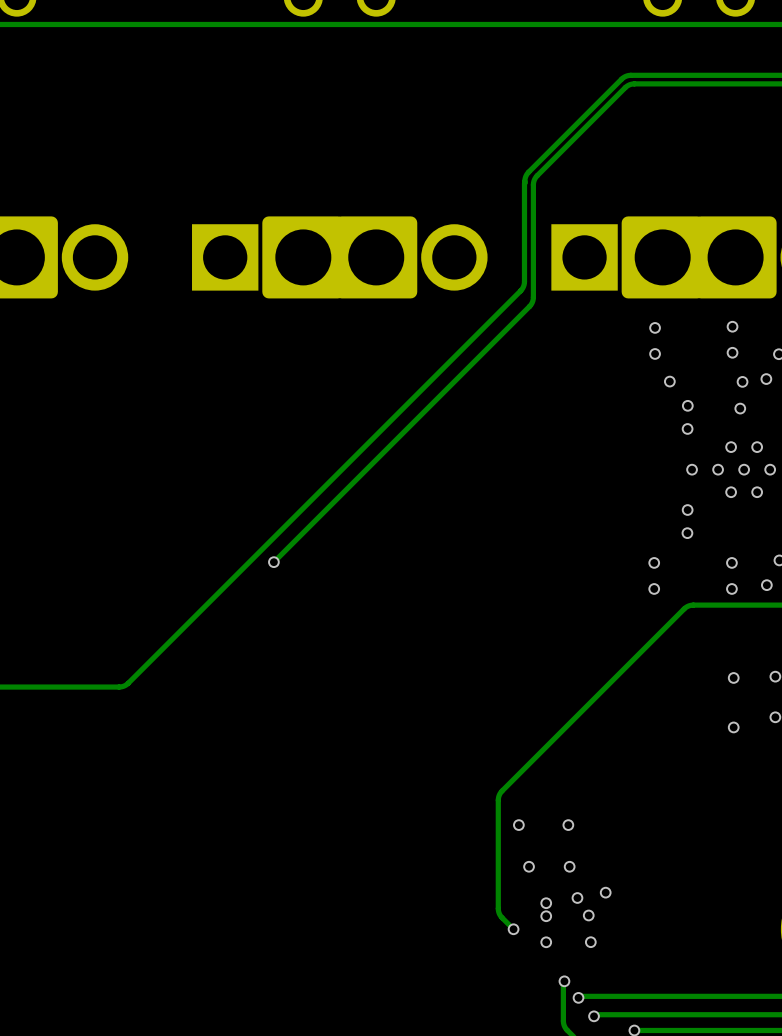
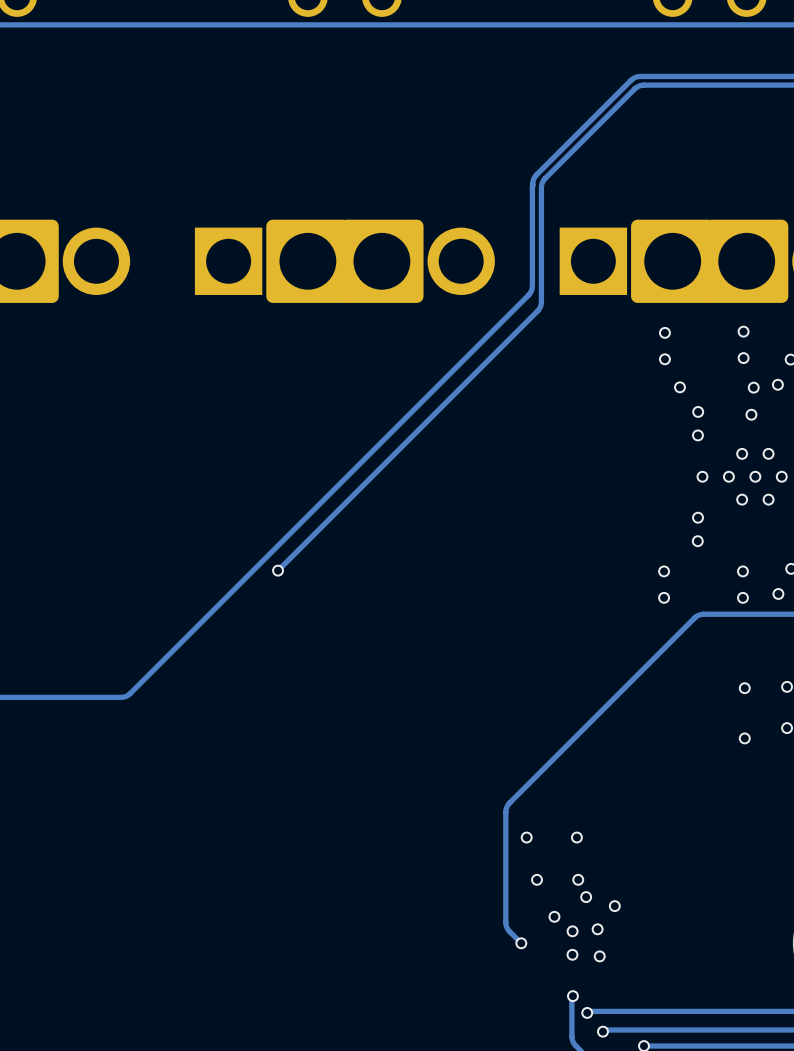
via: none -> (586, 897)
via: (577, 898) -> none
via: (546, 916) -> none
via: none -> (572, 931)
via: none -> (572, 954)
via: (546, 942) -> none

